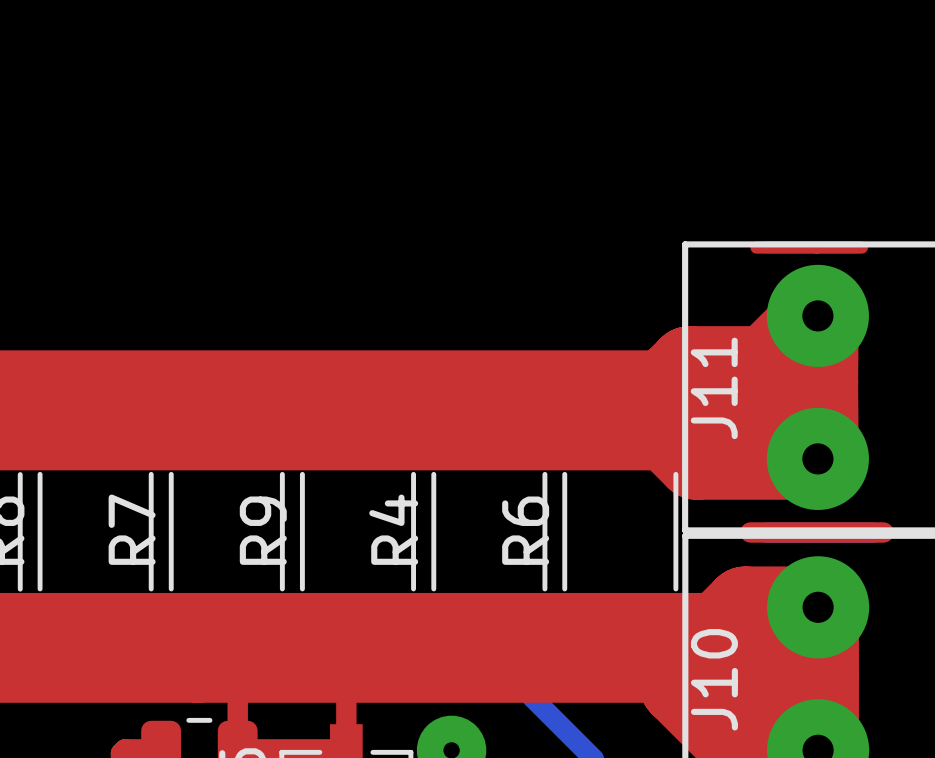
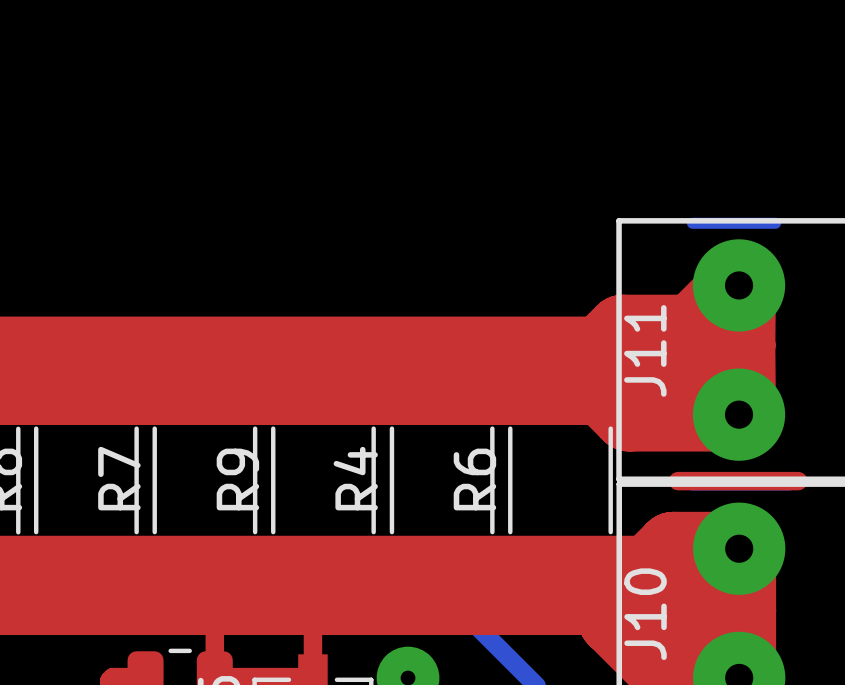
top track: (756, 247) (861, 247) -> none

